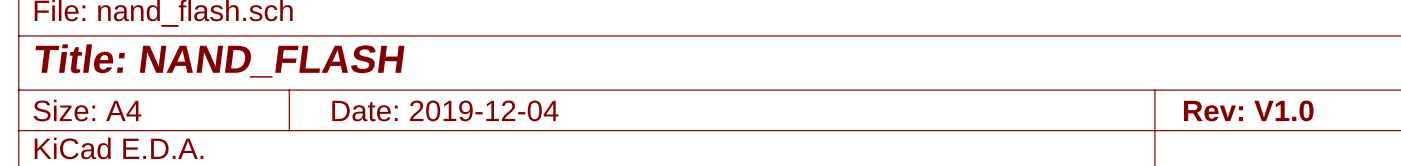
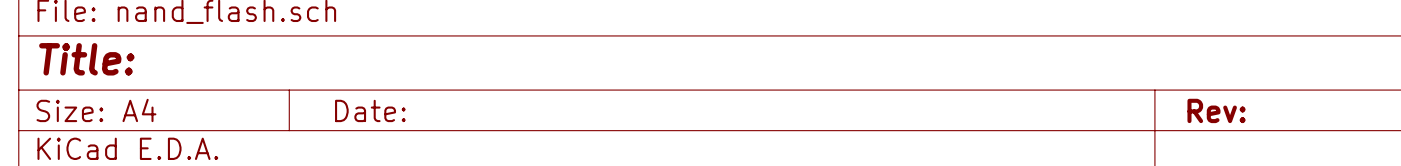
title block: Title: NAND_FLASH (219, 60) -> Title: (86, 59)
title block: Date: 2019-12-04 (445, 110) -> Date: (370, 110)
title block: Rev: V1.0 (1248, 110) -> Rev: (1216, 110)

